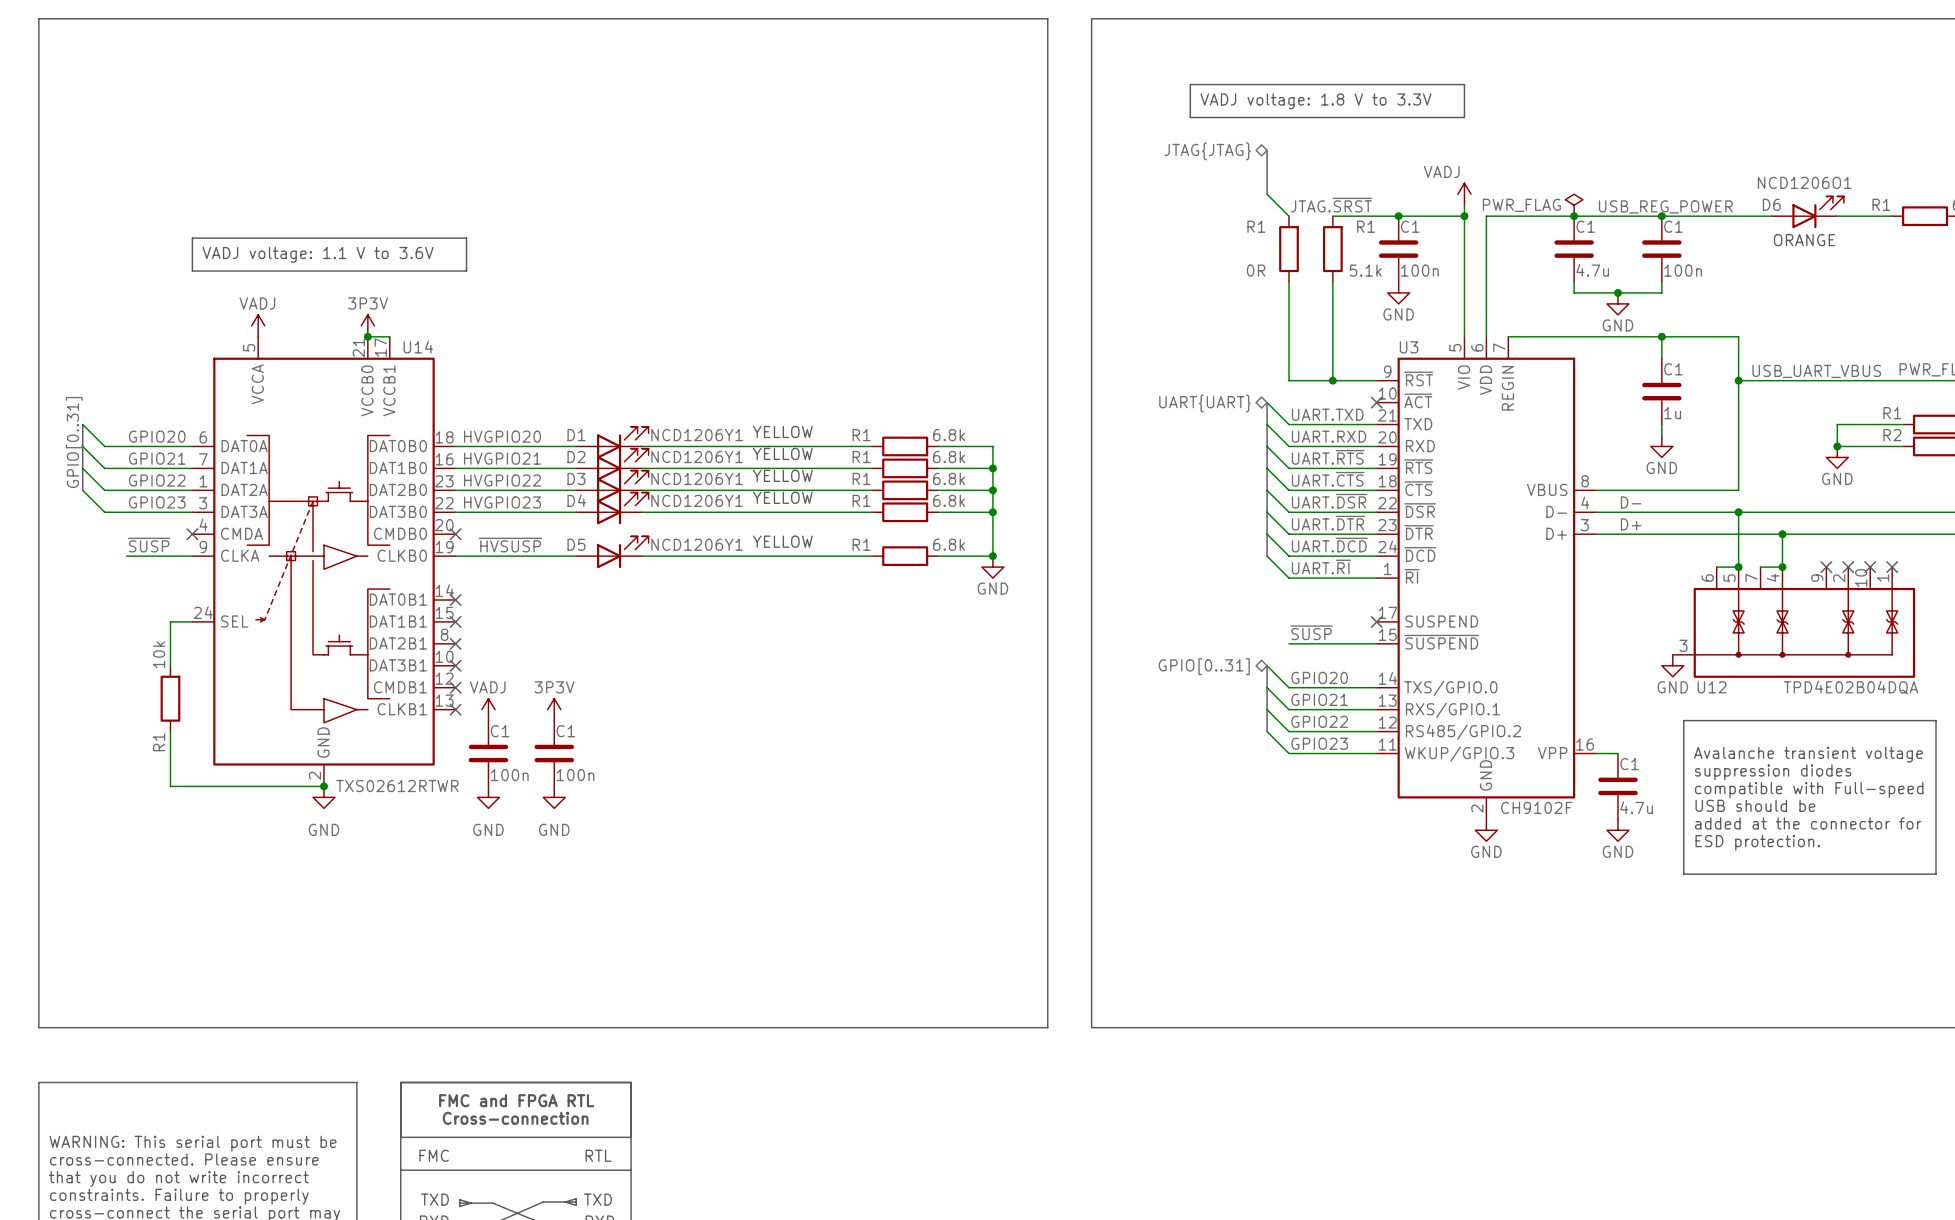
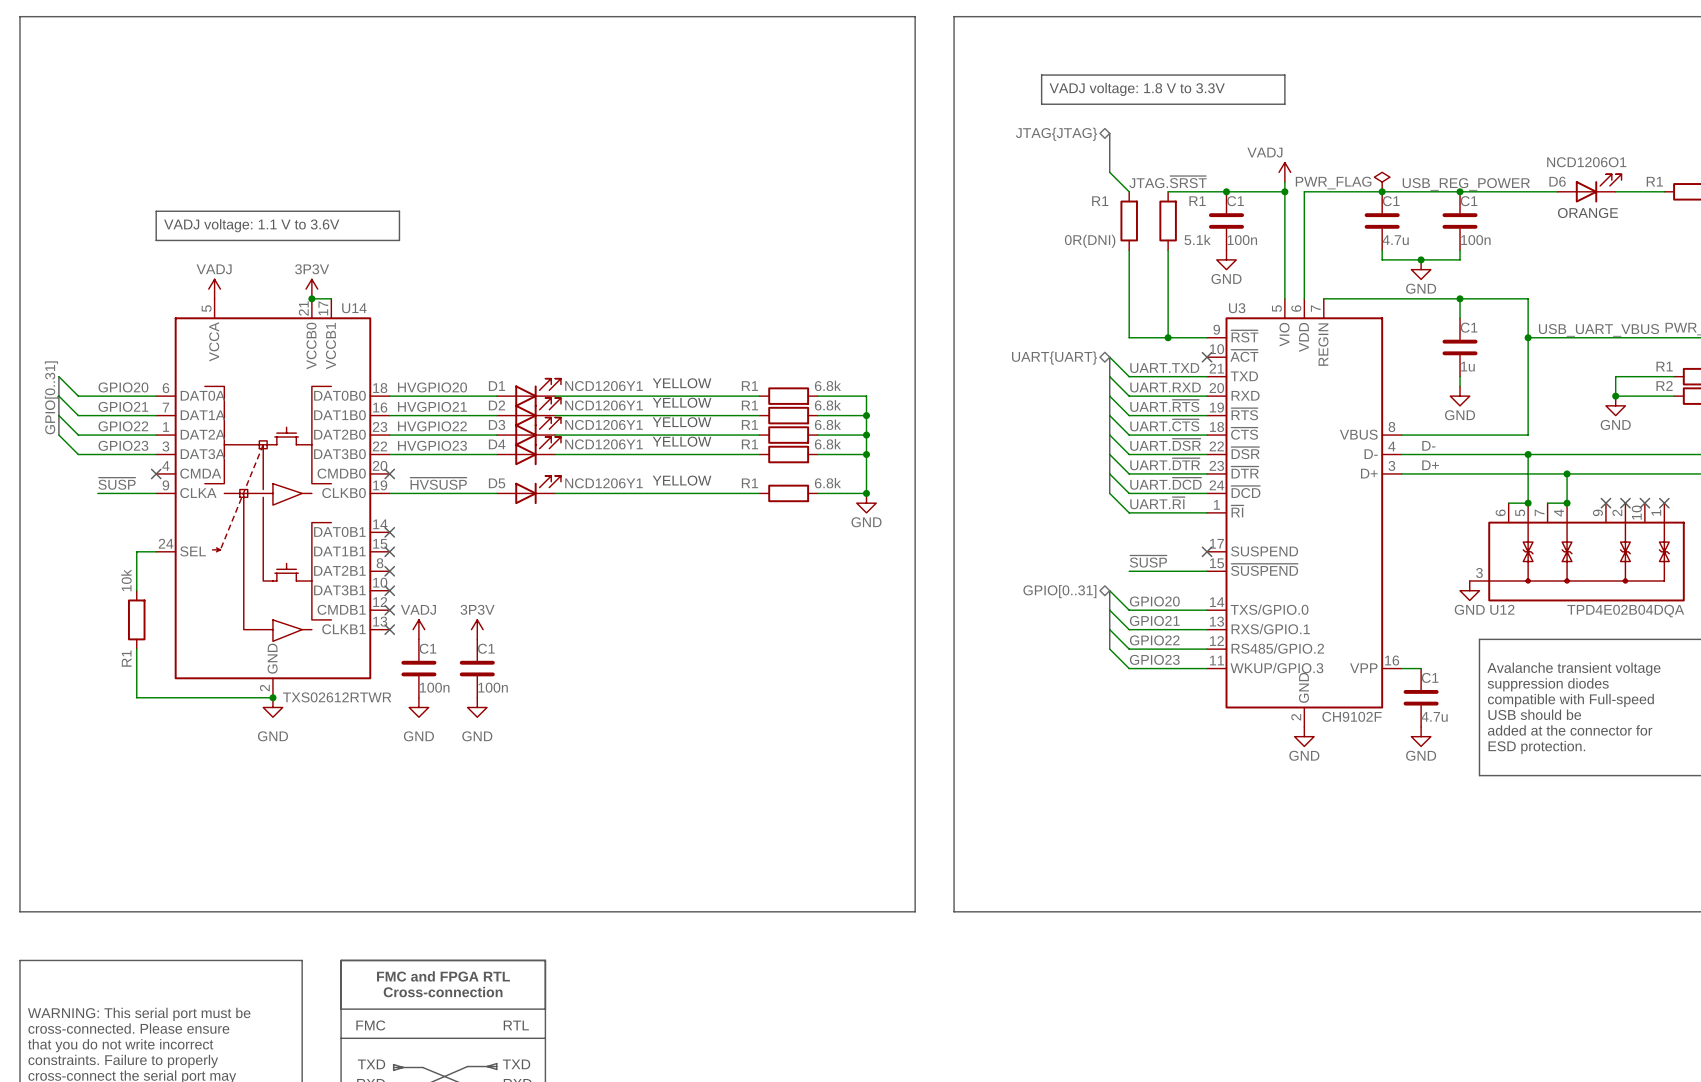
R1 value: 0R (1256, 270) -> 0R(DNI) (1090, 241)

